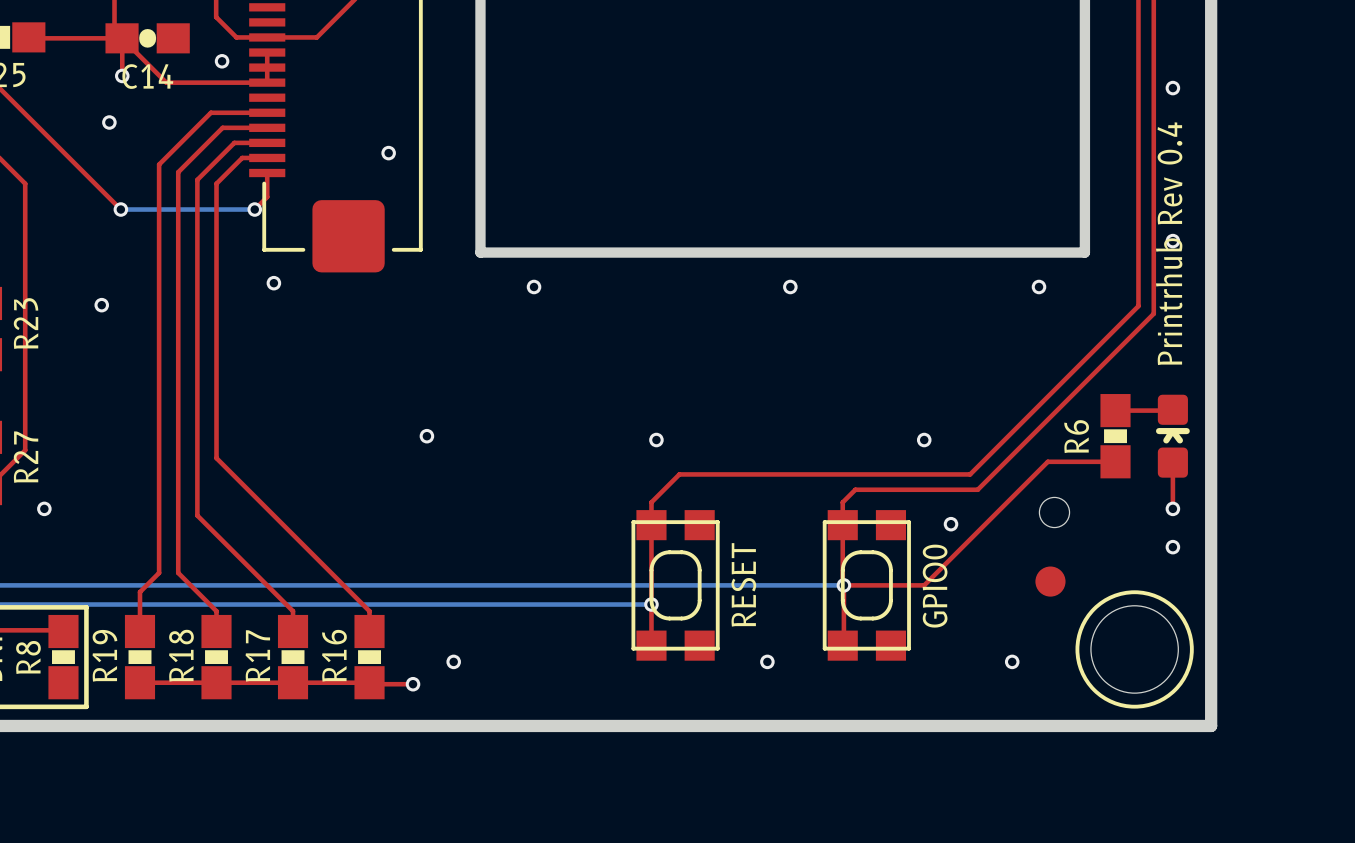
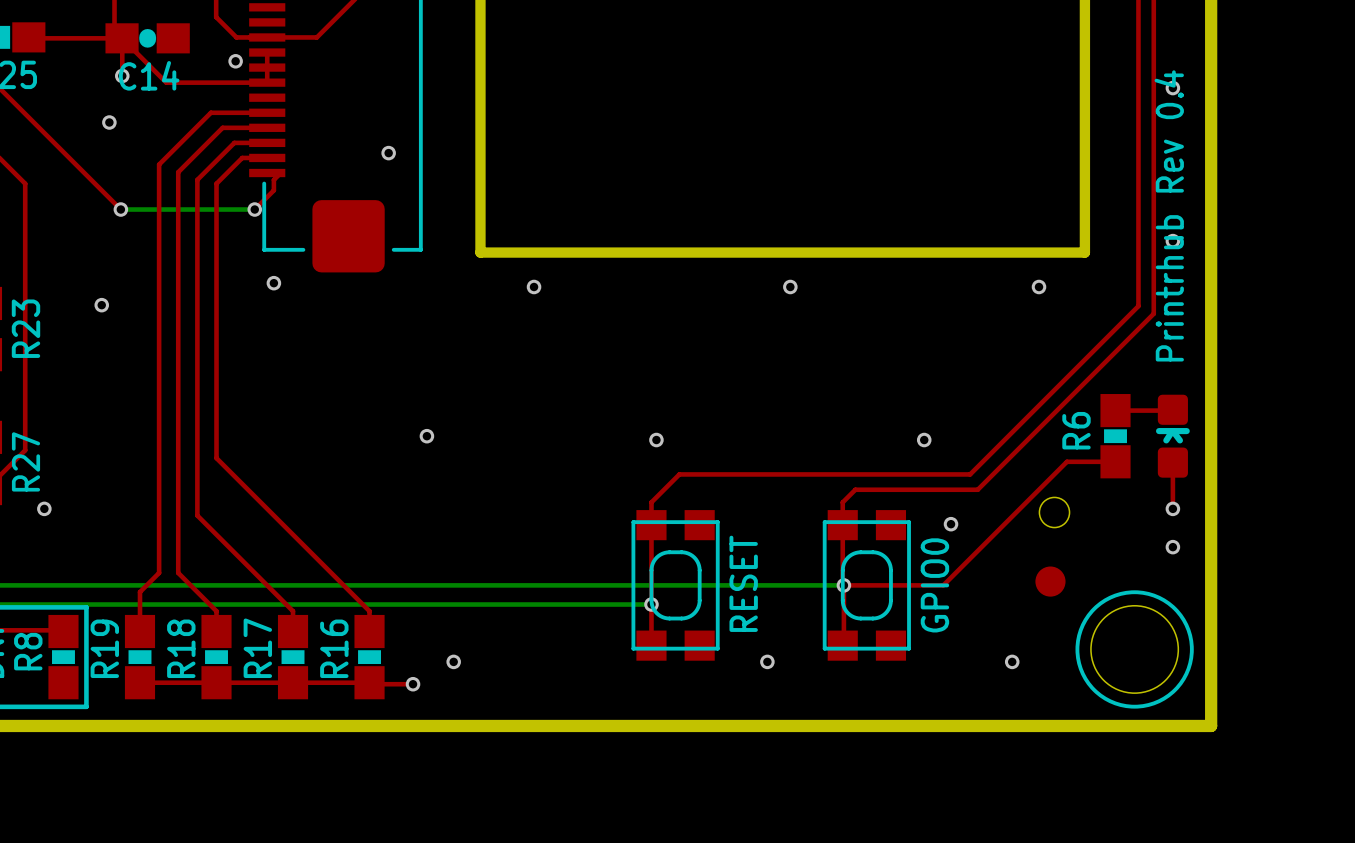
via position: (222, 61) -> (235, 61)
top track: (267, 173) (267, 197) -> (280, 173) (273, 179) (273, 190) (267, 197)
top track: (1066, 461) (1047, 461) (924, 585) -> (1066, 461) (943, 585) (924, 585)

